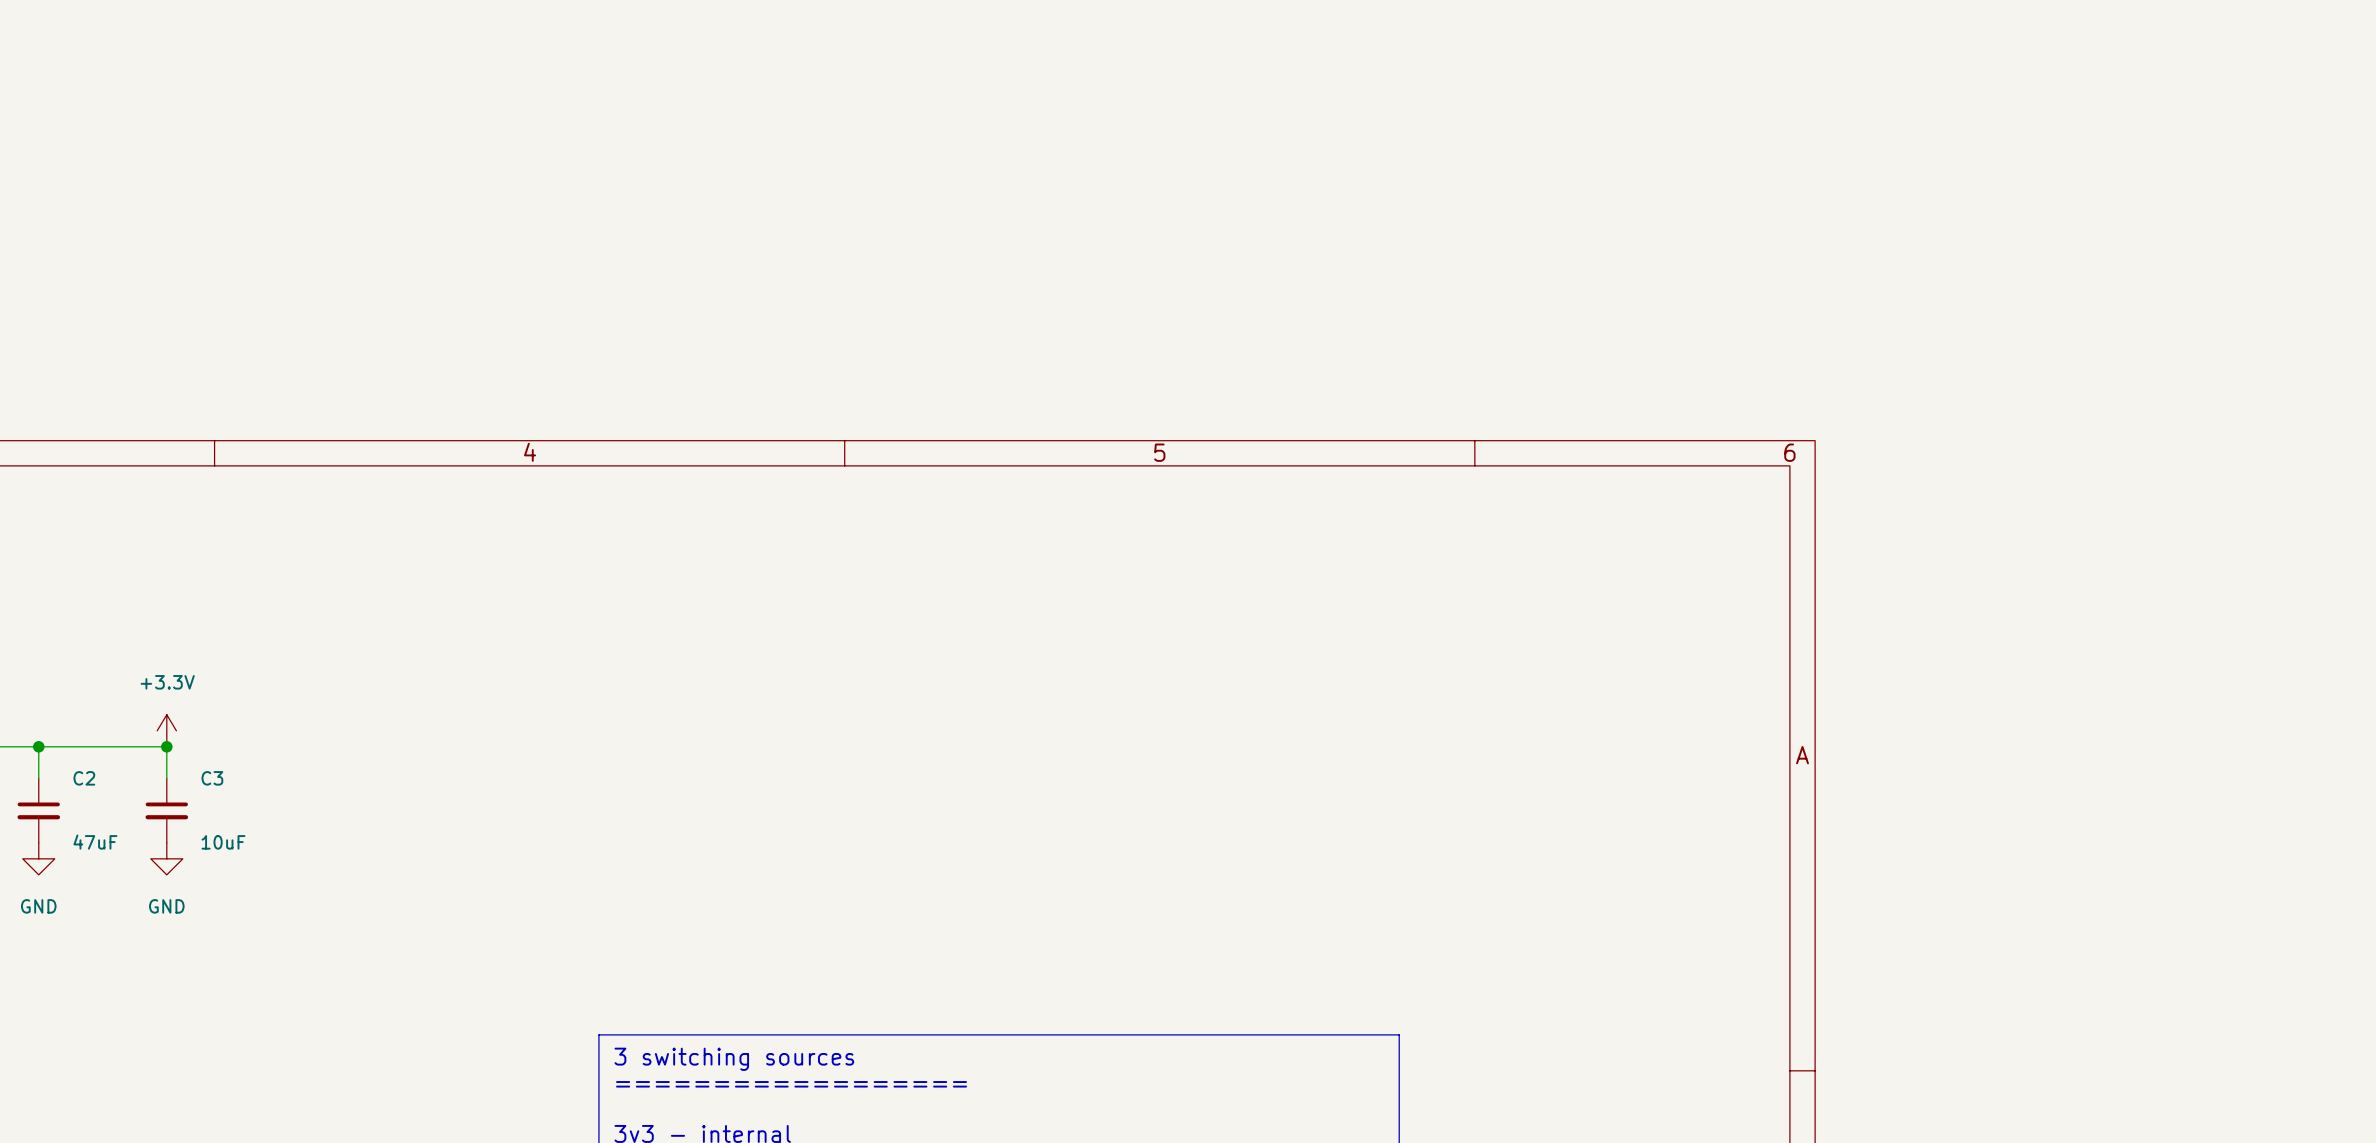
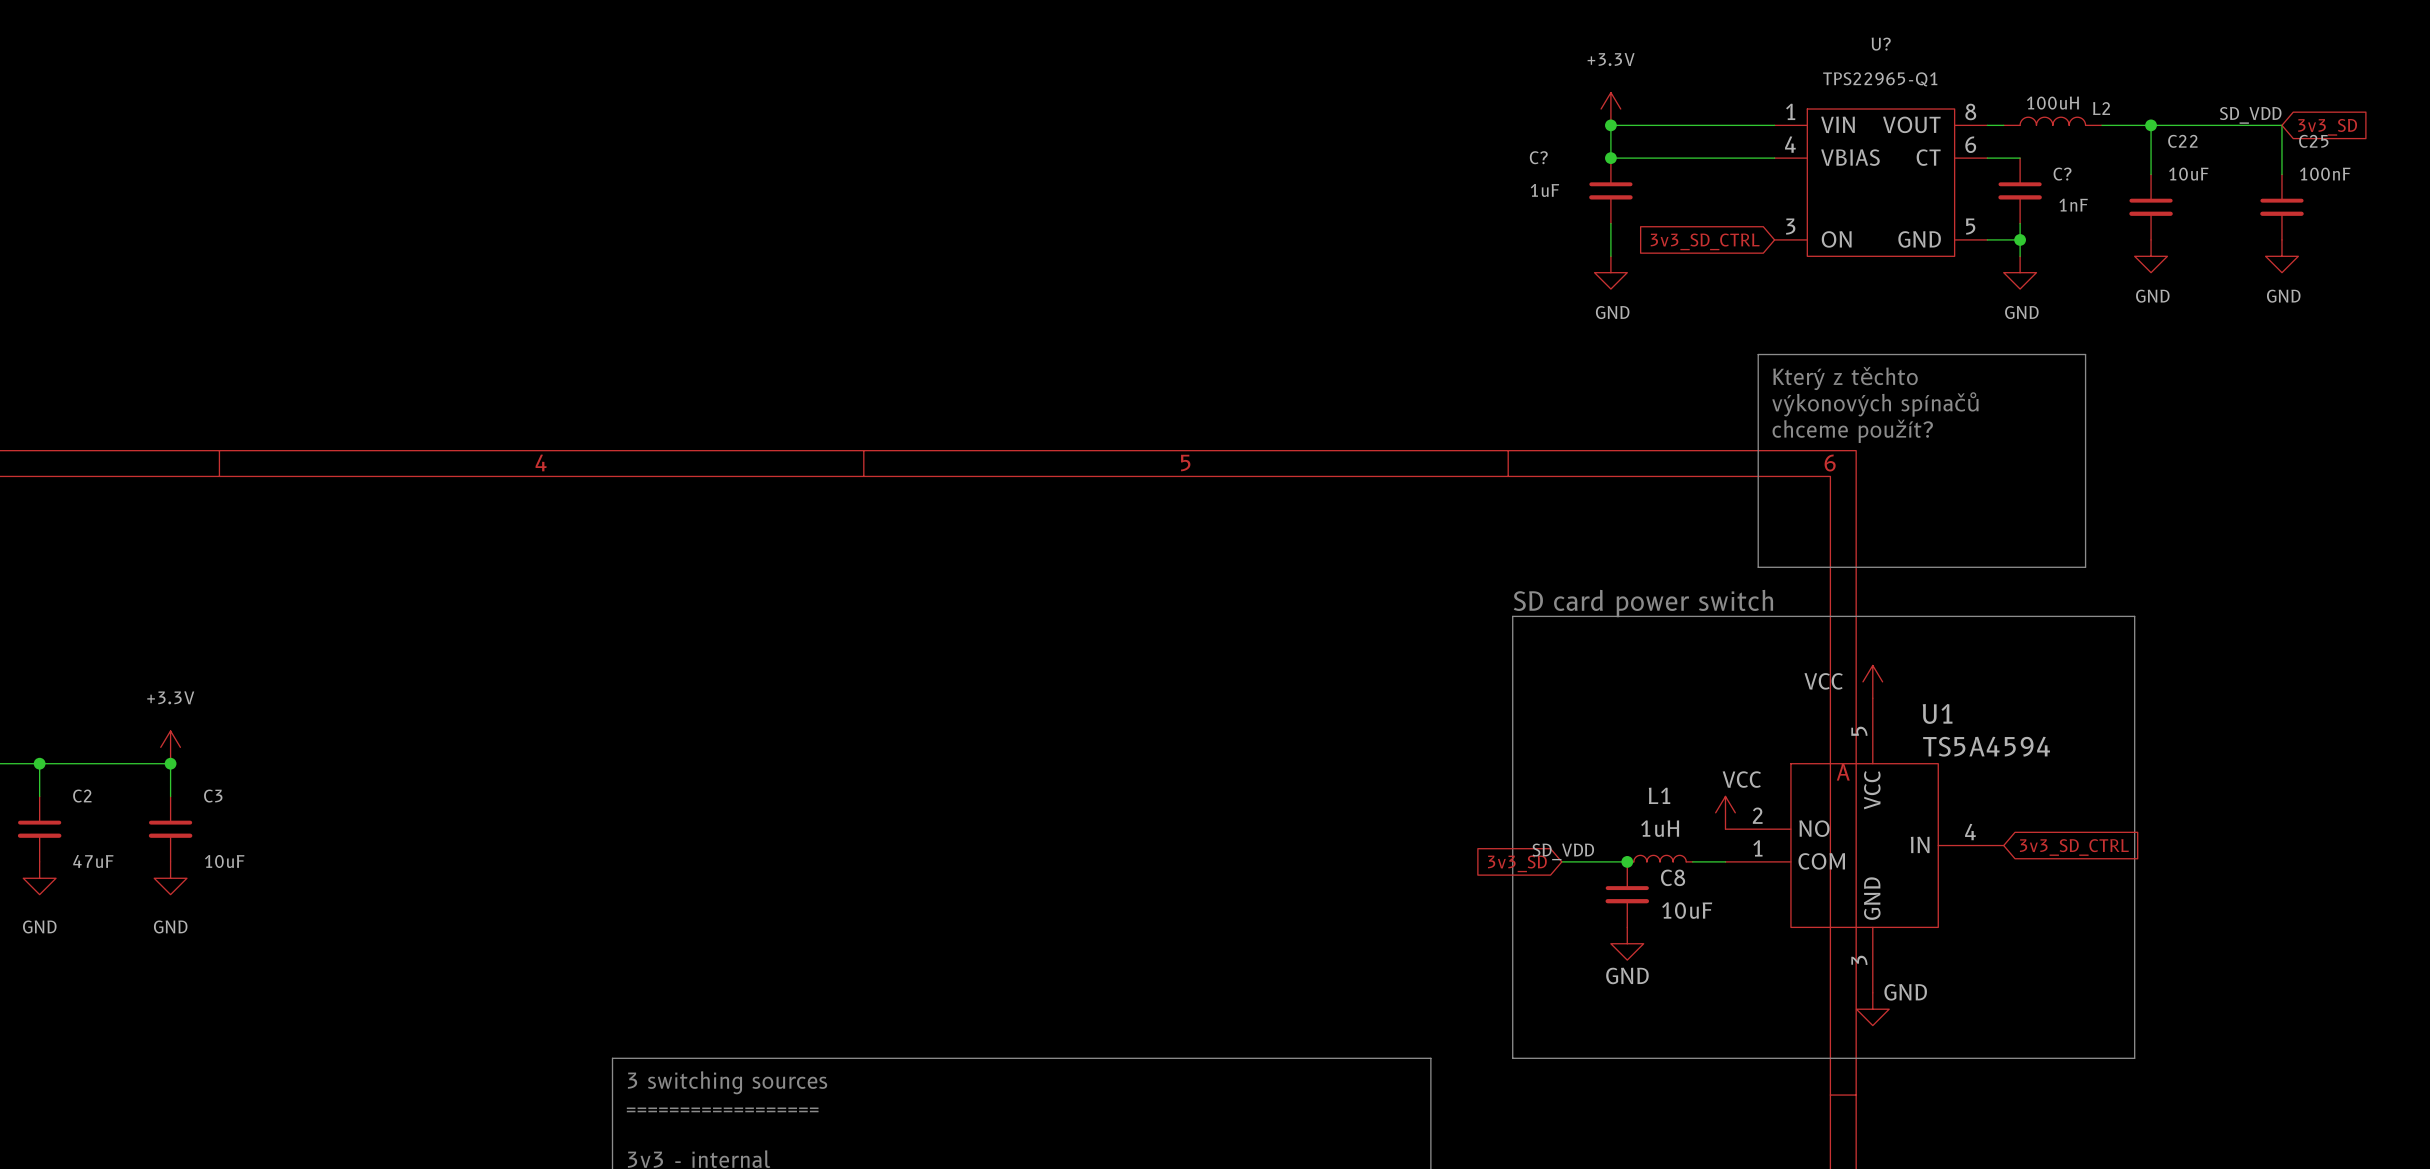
power symbol: none -> +3.3V (1610, 109)
label: none -> SD_VDD (2250, 115)
L2: none -> 100uH (2052, 121)
junction: none -> (1610, 125)
wire: none -> (1774, 125) (1610, 125) (1610, 158) (1774, 158)
wire: none -> (1987, 125) (2003, 125)
wire: none -> (2101, 125) (2281, 125) (2281, 174)
wire: none -> (2151, 125) (2151, 174)
junction: none -> (2151, 125)
global label: none -> 3v3_SD (2327, 127)
junction: none -> (1610, 158)
wire: none -> (1987, 158) (2020, 158)
U?: none -> TPS22965-Q1 (1880, 182)
C?: none -> 1uF (1610, 190)
C?: none -> 1nF (2020, 190)
C22: none -> 10uF (2151, 207)
C25: none -> 100nF (2281, 207)
wire: none -> (1610, 223) (1610, 256)
wire: none -> (2020, 223) (2020, 256)
wire: none -> (1987, 239) (2020, 239)
junction: none -> (2020, 239)
global label: none -> 3v3_SD_CTRL (1705, 241)
power symbol: none -> GND (2151, 256)
power symbol: none -> GND (2281, 256)
power symbol: none -> GND (1610, 272)
power symbol: none -> GND (2020, 272)
line: none -> (1758, 354) (2085, 354) (2085, 567) (1758, 567) (1758, 354)
text: none -> Který z těchto (1845, 378)
text: none -> výkonových spínačů (1875, 404)
text: none -> chceme použít? (1852, 431)
text: none -> SD card power switch (1643, 603)
line: none -> (1512, 616) (2134, 616) (2134, 1058) (1512, 1058) (1512, 616)
power symbol: none -> VCC (1872, 681)
power symbol: none -> VCC (1725, 812)
U1: none -> TS5A4594 (1864, 845)
global label: none -> 3v3_SD_CTRL (2074, 847)
label: none -> SD_VDD (1563, 851)
L1: none -> 1uH (1660, 858)
wire: none -> (1561, 861) (1627, 861)
junction: none -> (1627, 861)
wire: none -> (1692, 861) (1725, 861)
global label: none -> 3v3_SD (1517, 863)
C8: none -> 10uF (1627, 894)
power symbol: none -> GND (1627, 943)
power symbol: none -> GND (1872, 1009)

